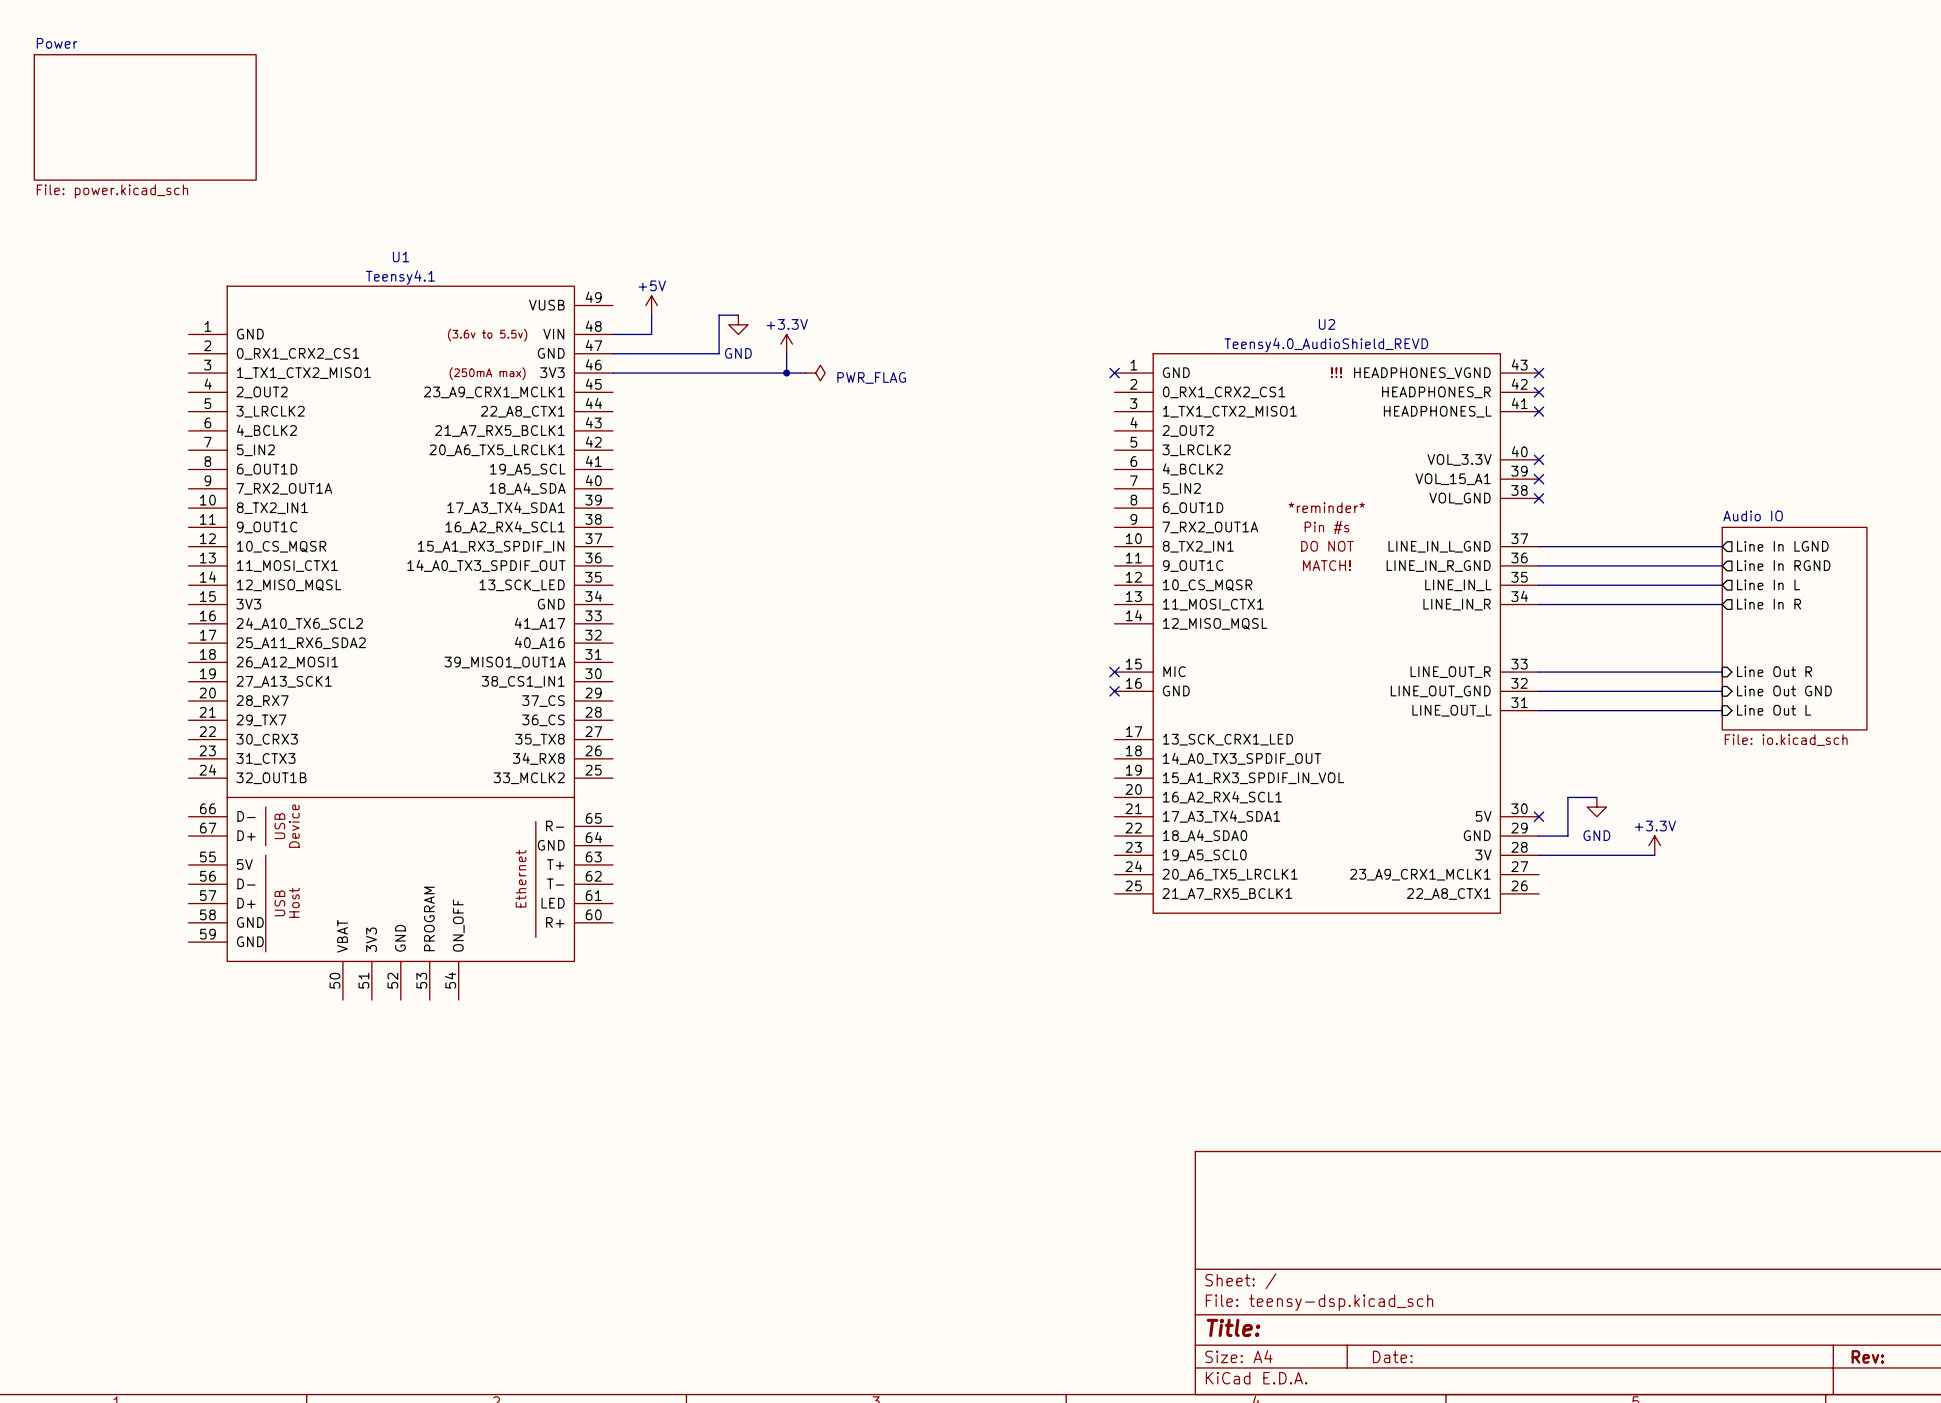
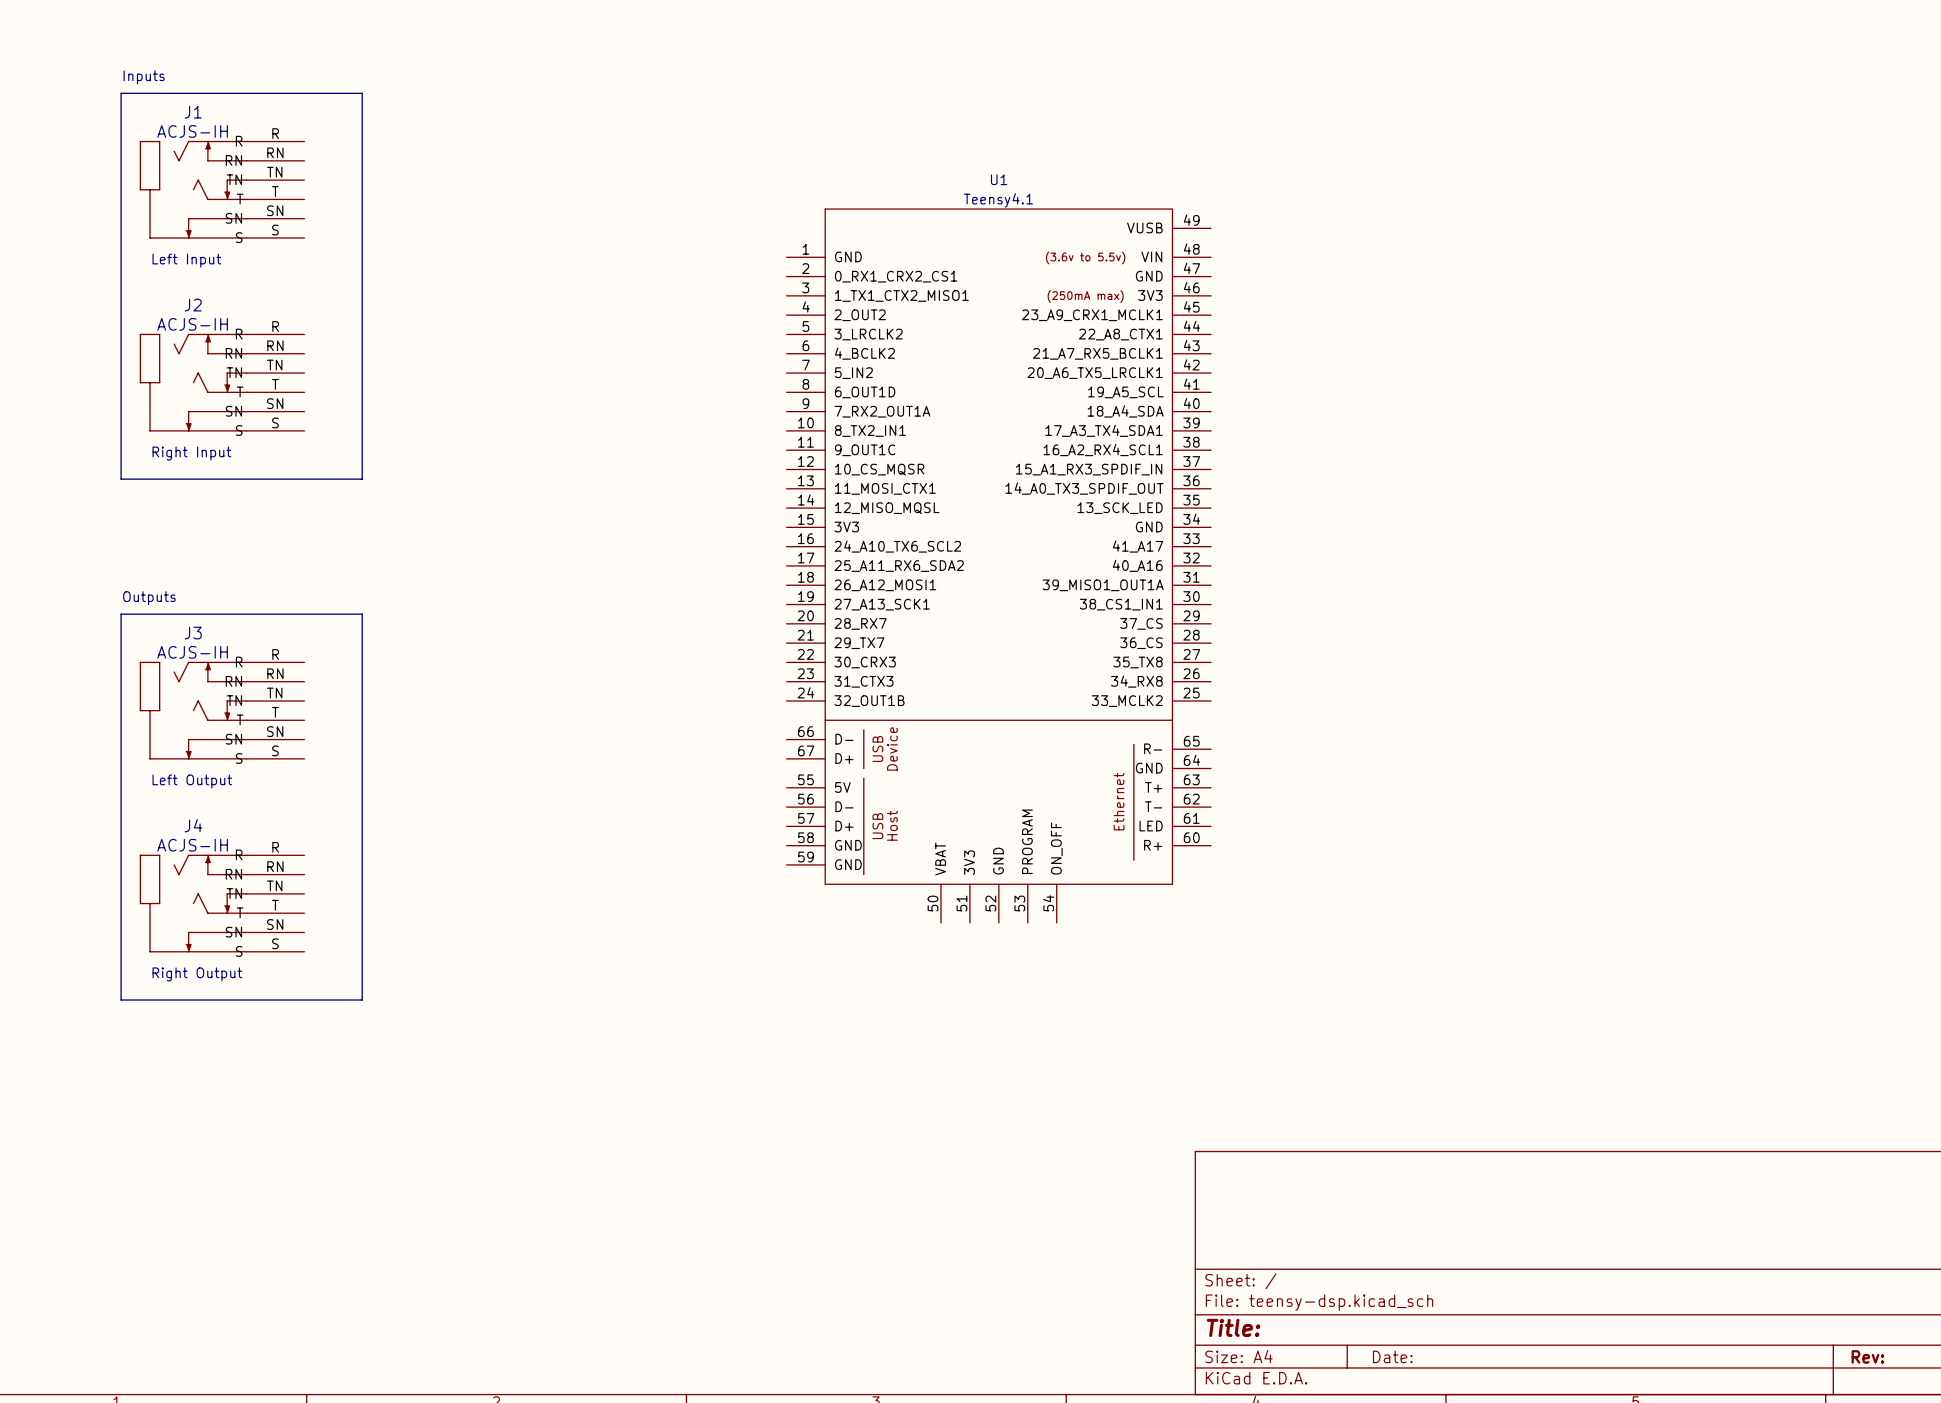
text: none -> Inputs (144, 77)
line: none -> (121, 93) (121, 479) (362, 479) (362, 93) (121, 93)
sheet Power: File: power.kicad_sch (145, 117) -> none
J1: none -> ACJS-IH (222, 189)
text: none -> Left Input (186, 260)
power symbol: +5V (651, 305) -> none
wire: (651, 315) (651, 334) (613, 334) -> none
wire: (738, 315) (719, 315) (719, 353) (613, 353) -> none
power symbol: GND (738, 324) -> none
power symbol: +3.3V (786, 344) -> none
wire: (786, 353) (786, 373) -> none
wire: (613, 373) (805, 373) -> none
junction: (786, 373) -> none
power symbol: PWR_FLAG (815, 373) -> none
no-connect mark: (1114, 373) -> none
no-connect mark: (1539, 373) -> none
J2: none -> ACJS-IH (222, 382)
no-connect mark: (1539, 392) -> none
no-connect mark: (1539, 411) -> none
text: none -> Right Input (191, 453)
no-connect mark: (1539, 459) -> none
no-connect mark: (1539, 479) -> none
no-connect mark: (1539, 498) -> none
wire: (1539, 546) (1722, 546) -> none
sheet pin: Line In LGND (1782, 546) -> none
wire: (1539, 565) (1722, 565) -> none
sheet pin: Line In RGND (1783, 565) -> none
sheet pin: Line In L (1768, 584) -> none
wire: (1539, 585) (1722, 585) -> none
text: none -> Outputs (149, 598)
wire: (1539, 604) (1722, 604) -> none
sheet pin: Line In R (1769, 604) -> none
line: none -> (121, 614) (362, 614) (362, 1000) (121, 1000) (121, 614)
sheet Audio IO: File: io.kicad_sch (1794, 628) -> none
U2: Teensy4.0_AudioShield_REVD (1326, 633) -> none
U1 position: (400, 643) -> (998, 565)
sheet pin: Line Out R (1774, 671) -> none
no-connect mark: (1114, 672) -> none
wire: (1539, 672) (1722, 672) -> none
sheet pin: Line Out GND (1784, 690) -> none
no-connect mark: (1114, 691) -> none
wire: (1539, 691) (1722, 691) -> none
J3: none -> ACJS-IH (222, 710)
wire: (1539, 710) (1722, 710) -> none
sheet pin: Line Out L (1774, 710) -> none
text: none -> Left Output (192, 781)
wire: (1596, 797) (1567, 797) (1567, 836) (1539, 836) -> none
power symbol: GND (1596, 807) -> none
no-connect mark: (1539, 816) -> none
power symbol: +3.3V (1654, 845) -> none
wire: (1539, 855) (1654, 855) -> none
J4: none -> ACJS-IH (222, 903)
text: none -> Right Output (197, 974)

